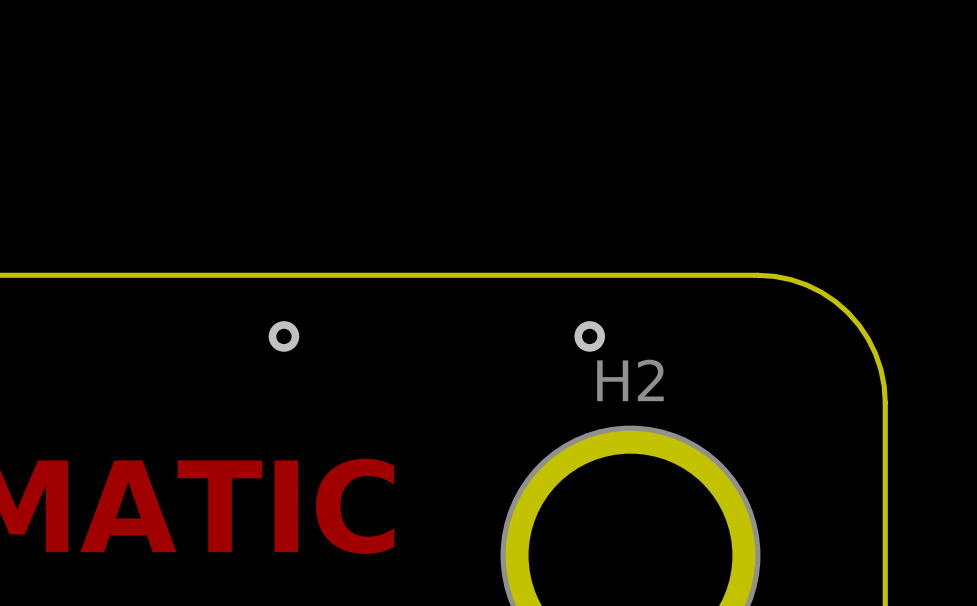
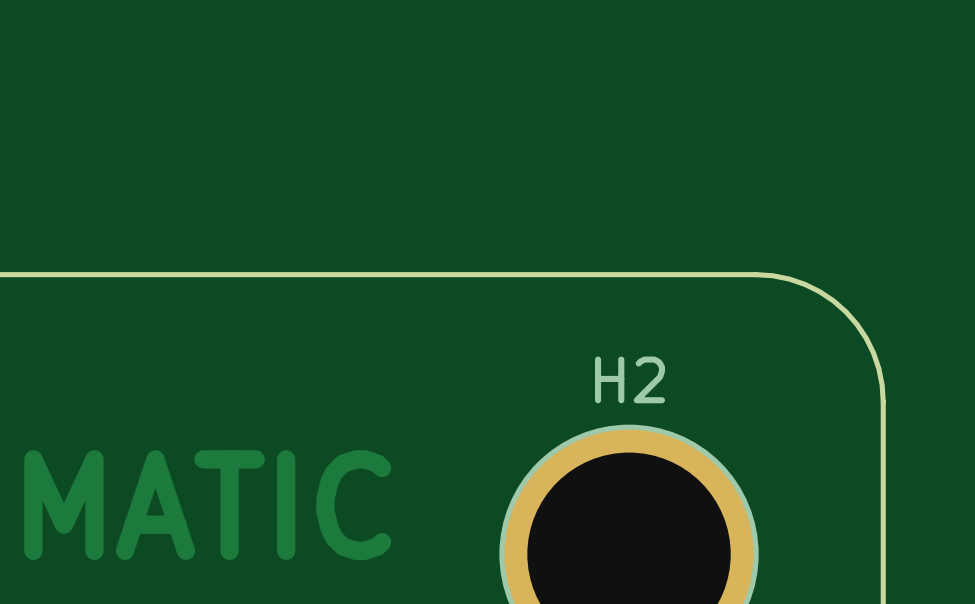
via: (283, 336) -> none
via: (589, 336) -> none

